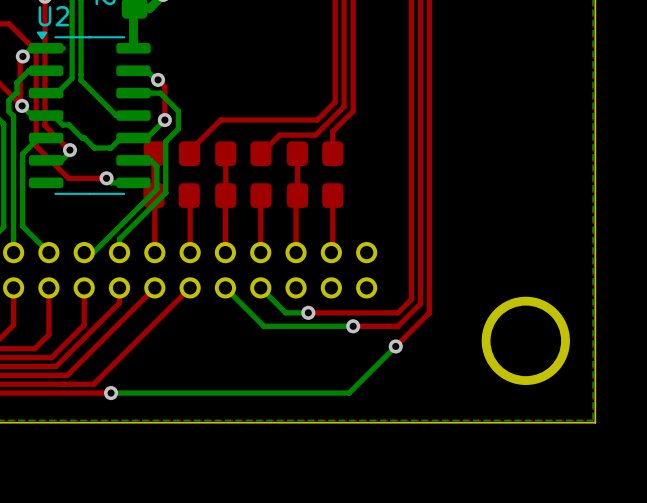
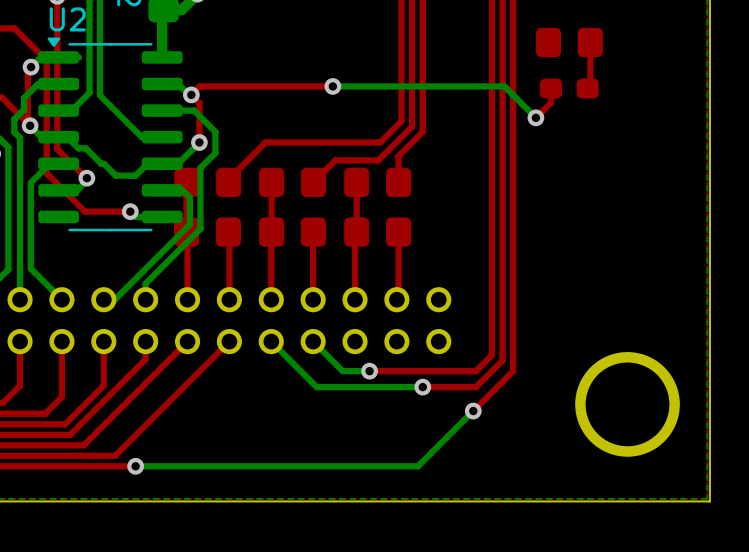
part: none -> (569, 42)
top track: none -> (590, 42) (590, 85) (587, 88)
top track: none -> (332, 86) (199, 86) (191, 94)
bottom track: none -> (332, 86) (504, 86) (535, 117)
via: none -> (332, 86)
top track: none -> (551, 88) (551, 102) (535, 117)
part: none -> (569, 88)
via: none -> (535, 117)

